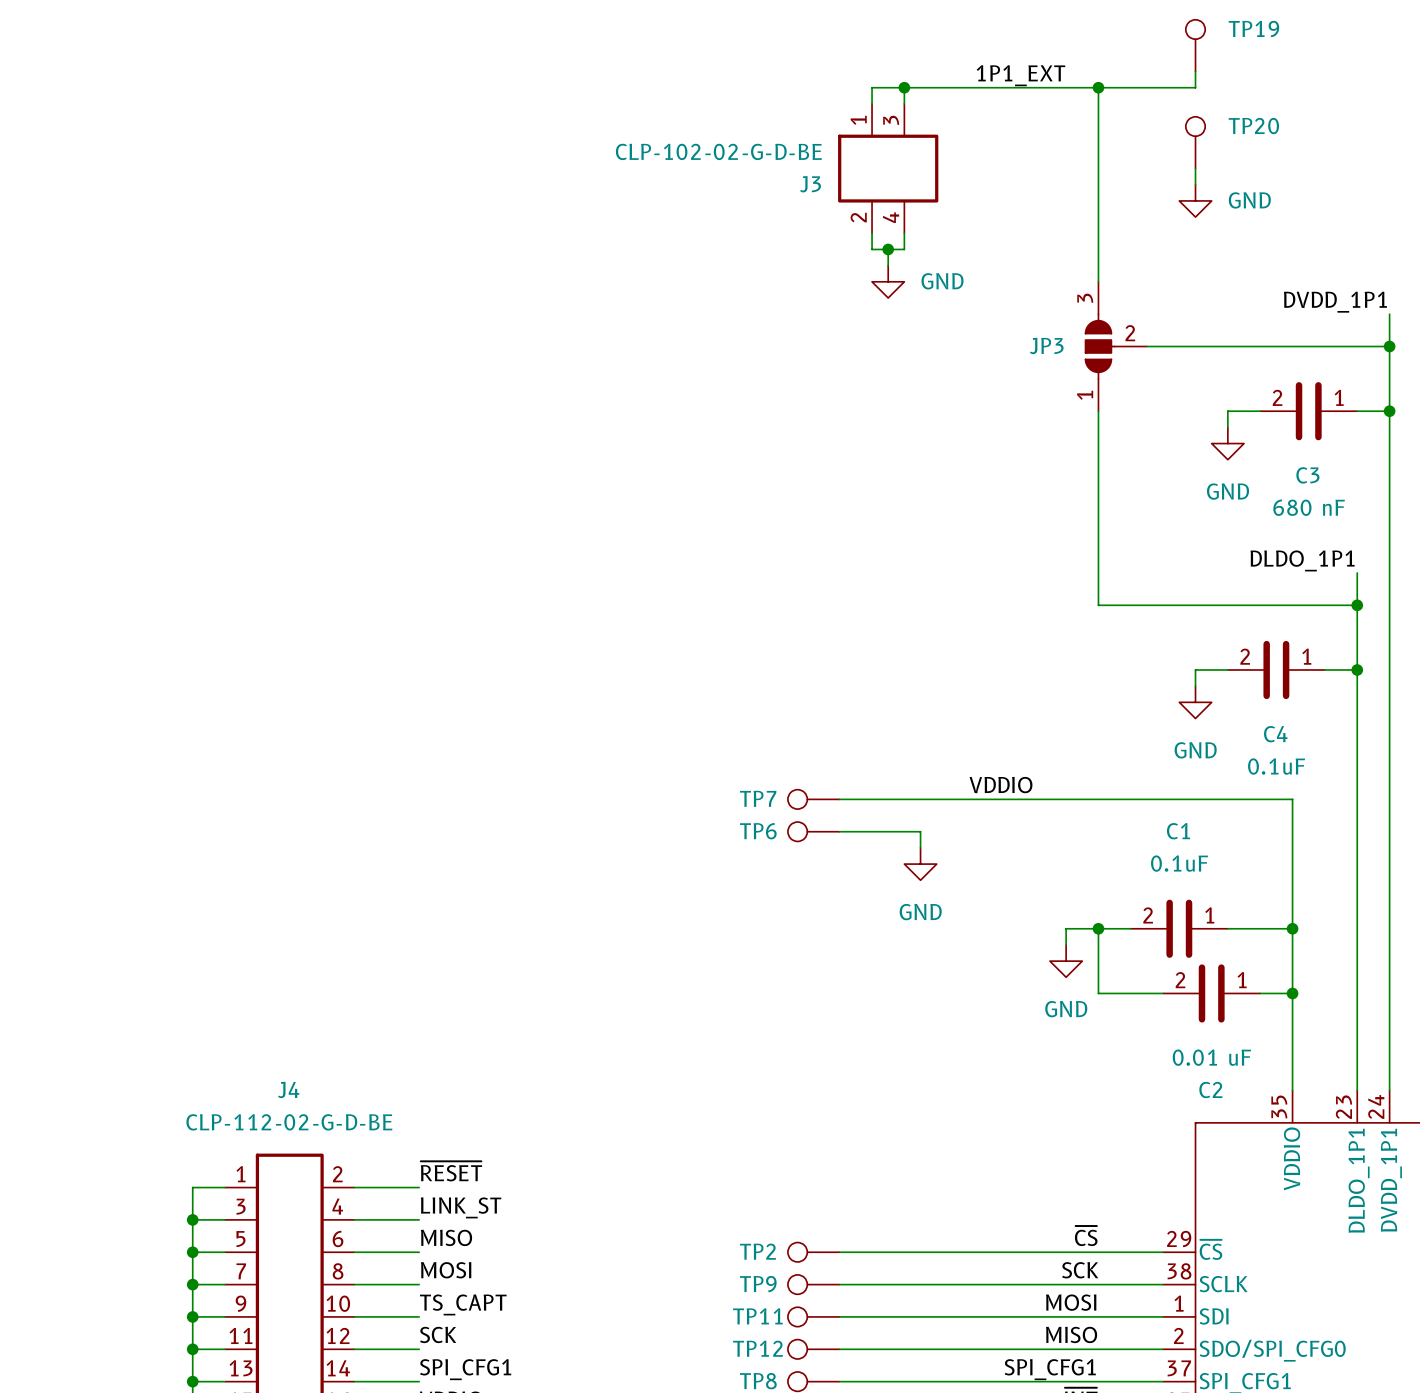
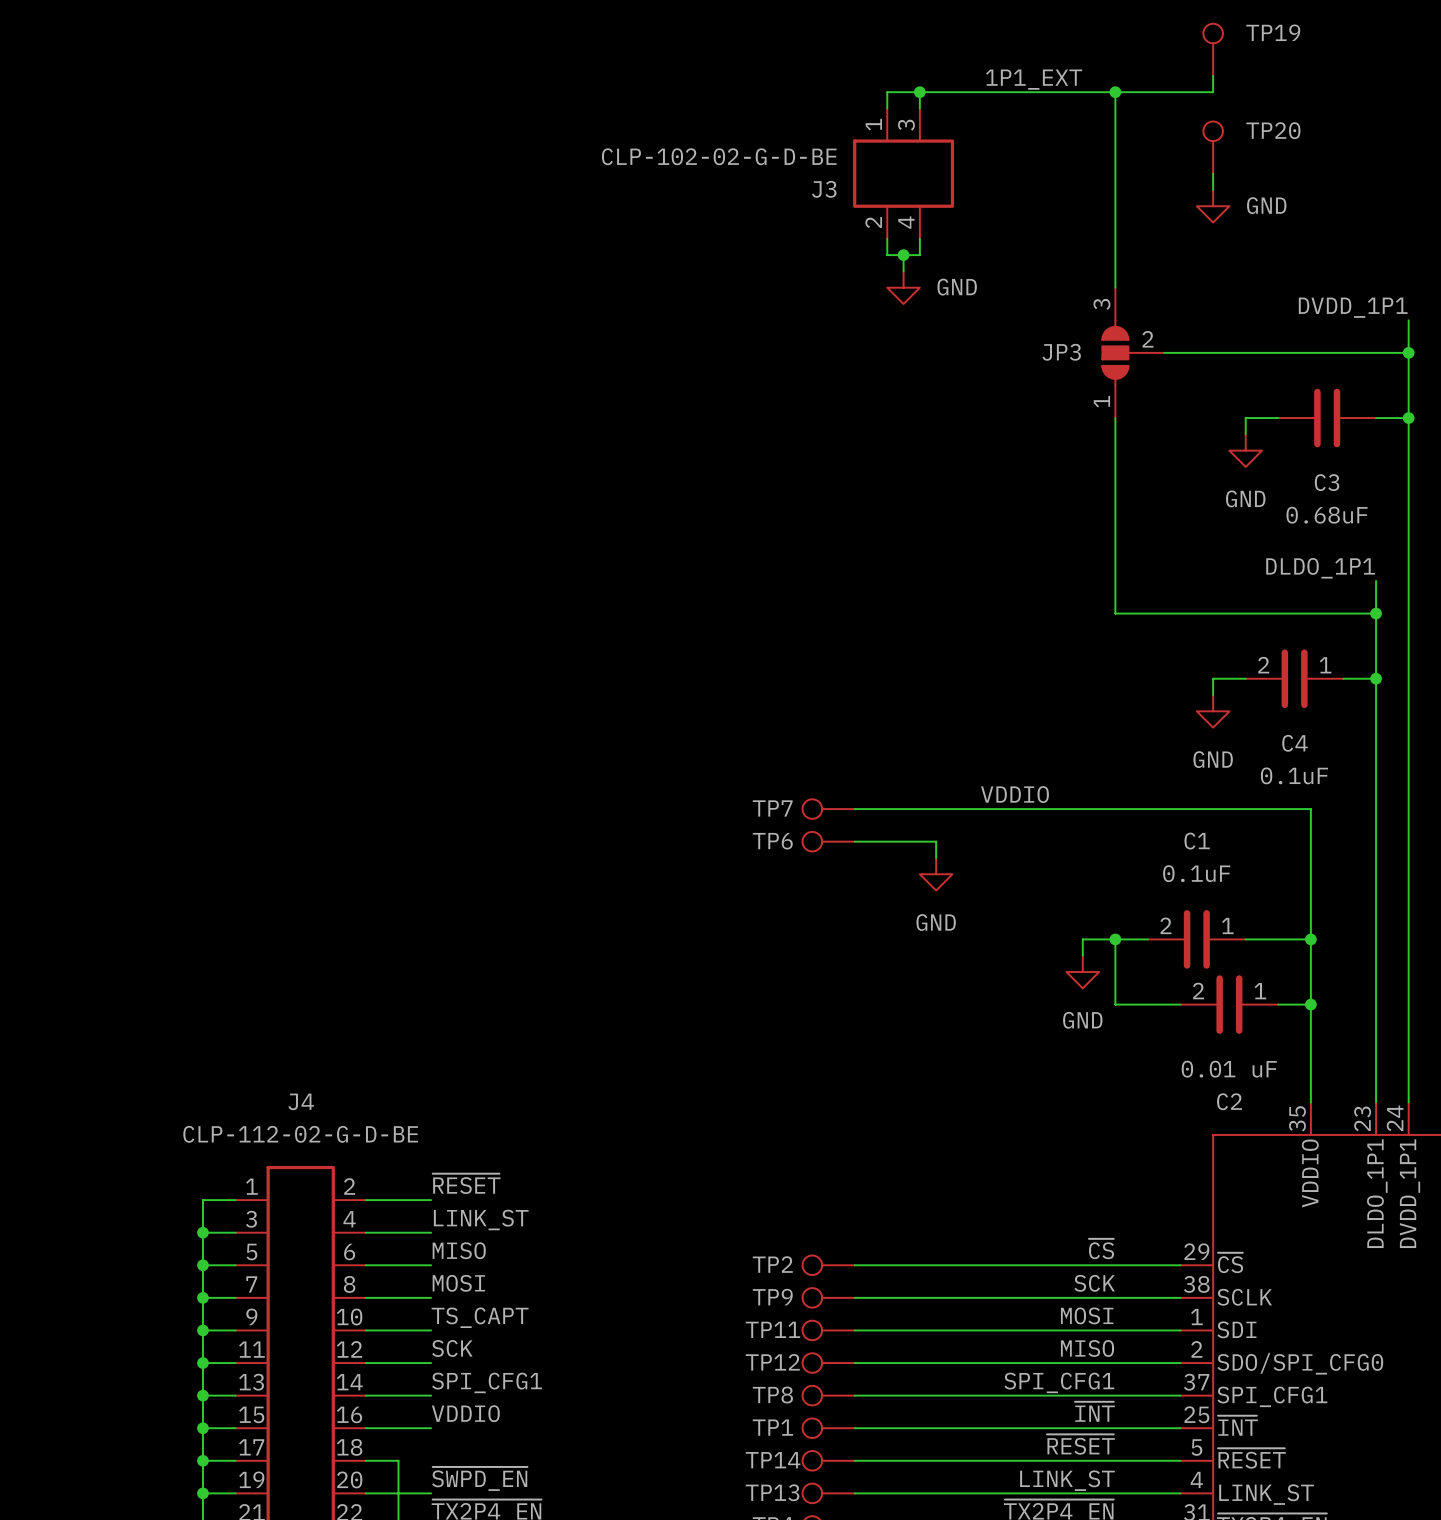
C3 pin number: 2 (1277, 397) -> none
C3 pin number: 1 (1339, 397) -> none
C3 value: 680 nF (1309, 507) -> 0.68uF (1327, 515)

